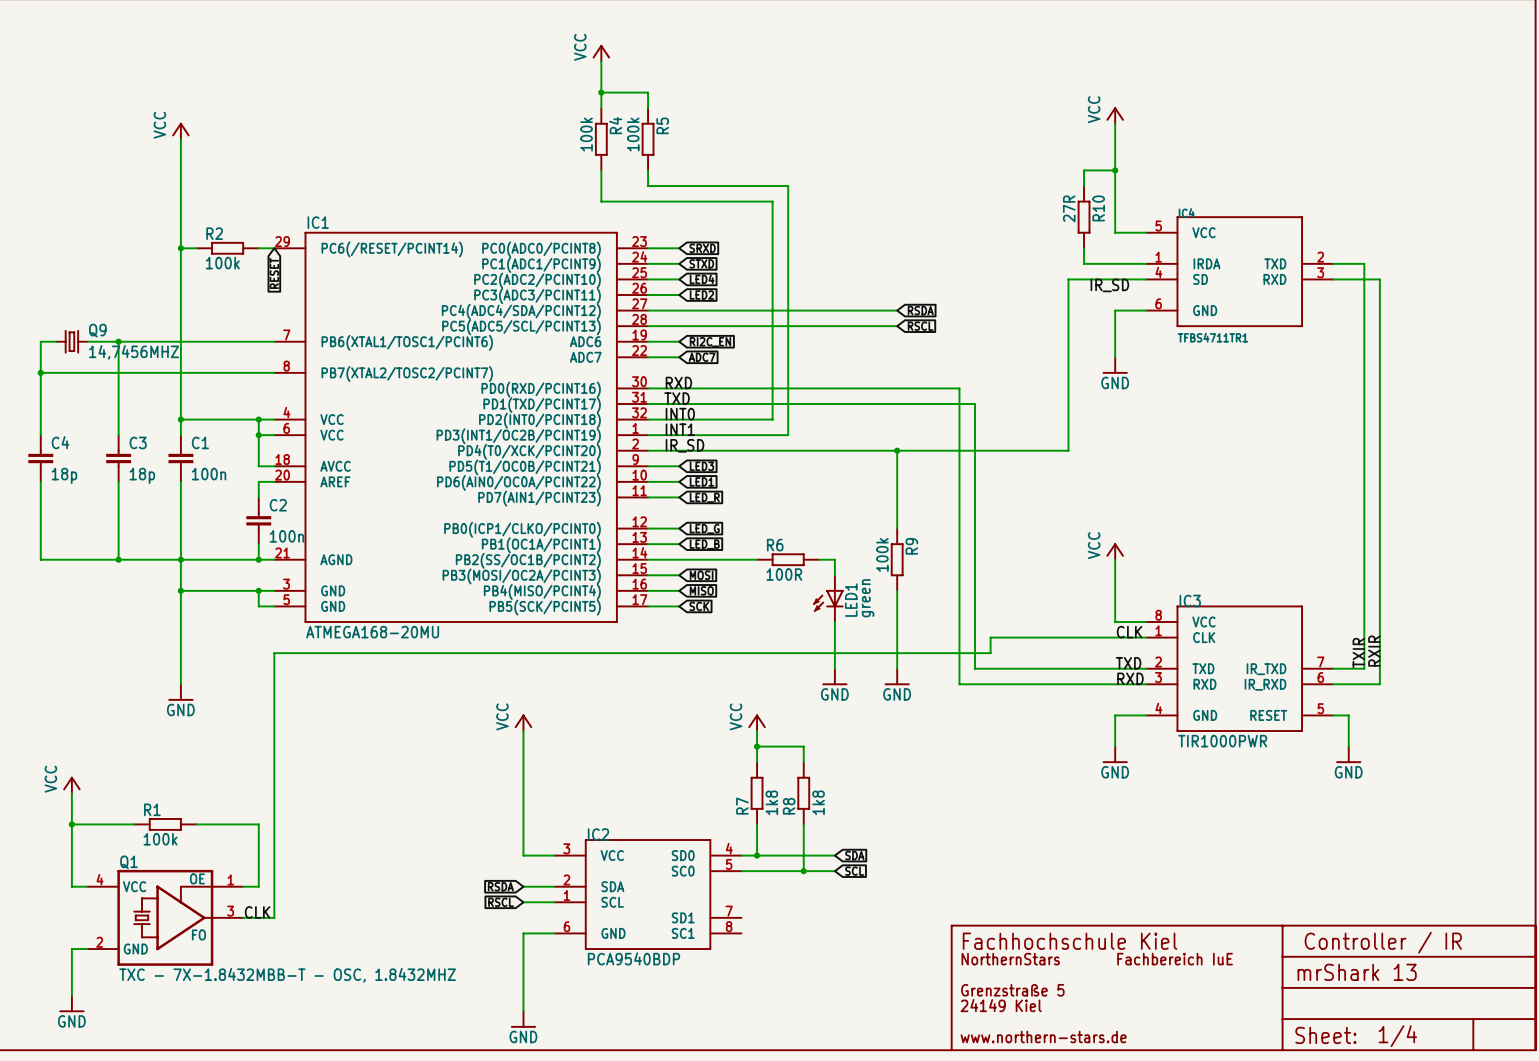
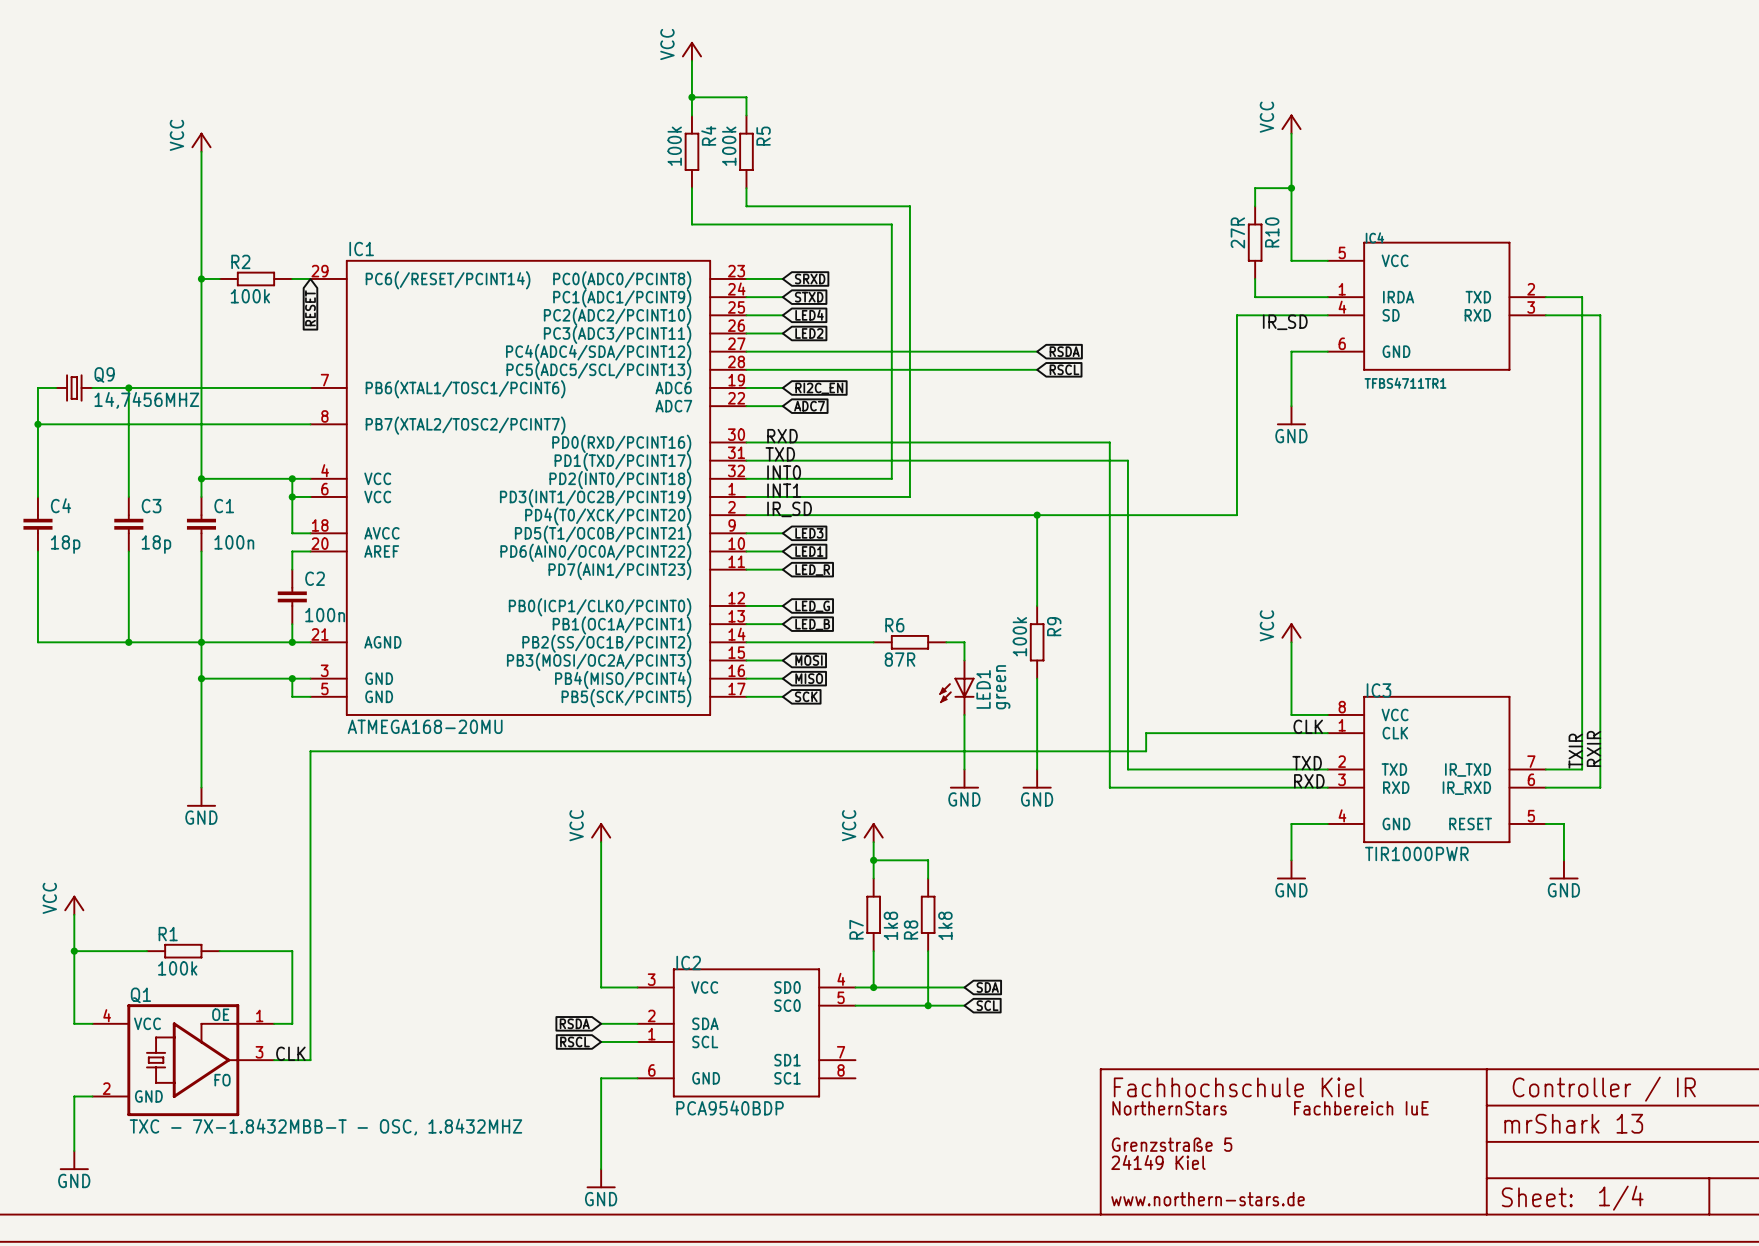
R6 value: 100R (784, 574) -> 87R (900, 659)

